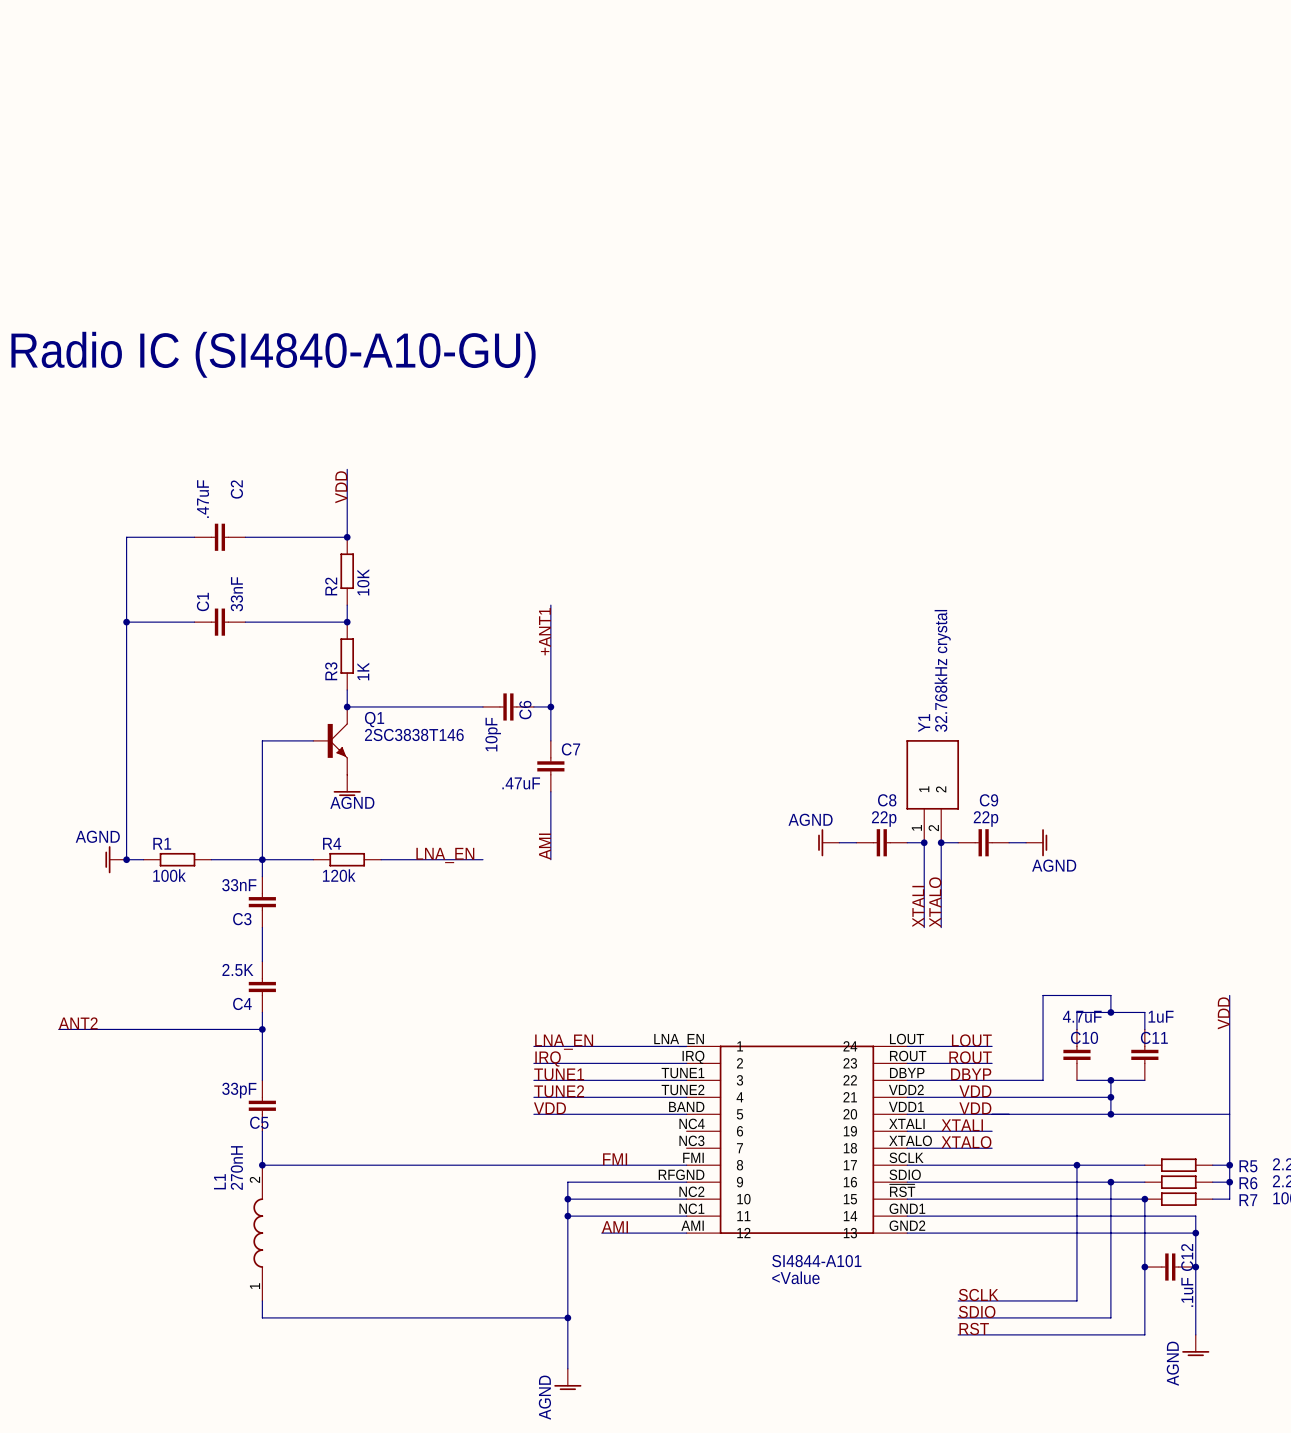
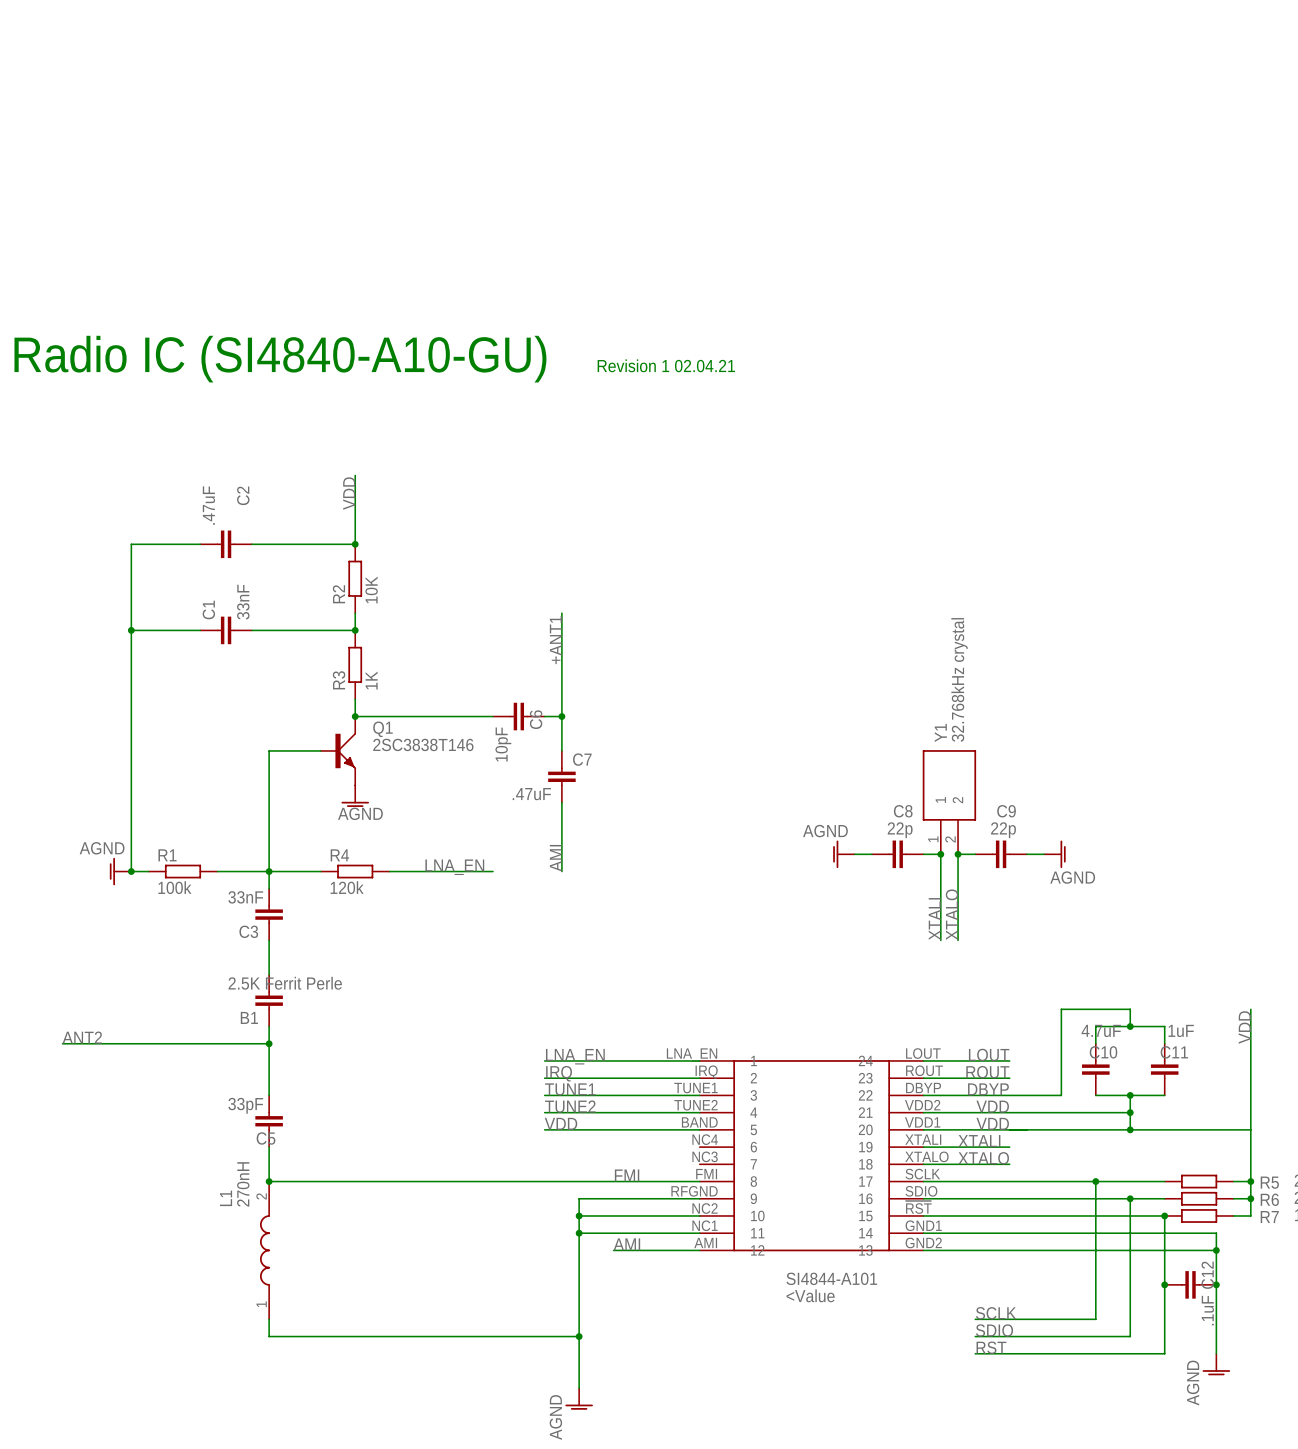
text: none -> Revision 1 02.04.21 (666, 365)
C4 value: 2.5K (237, 970) -> 2.5K Ferrit Perle (285, 983)
C4 name: C4 (242, 1003) -> B1 (249, 1017)

